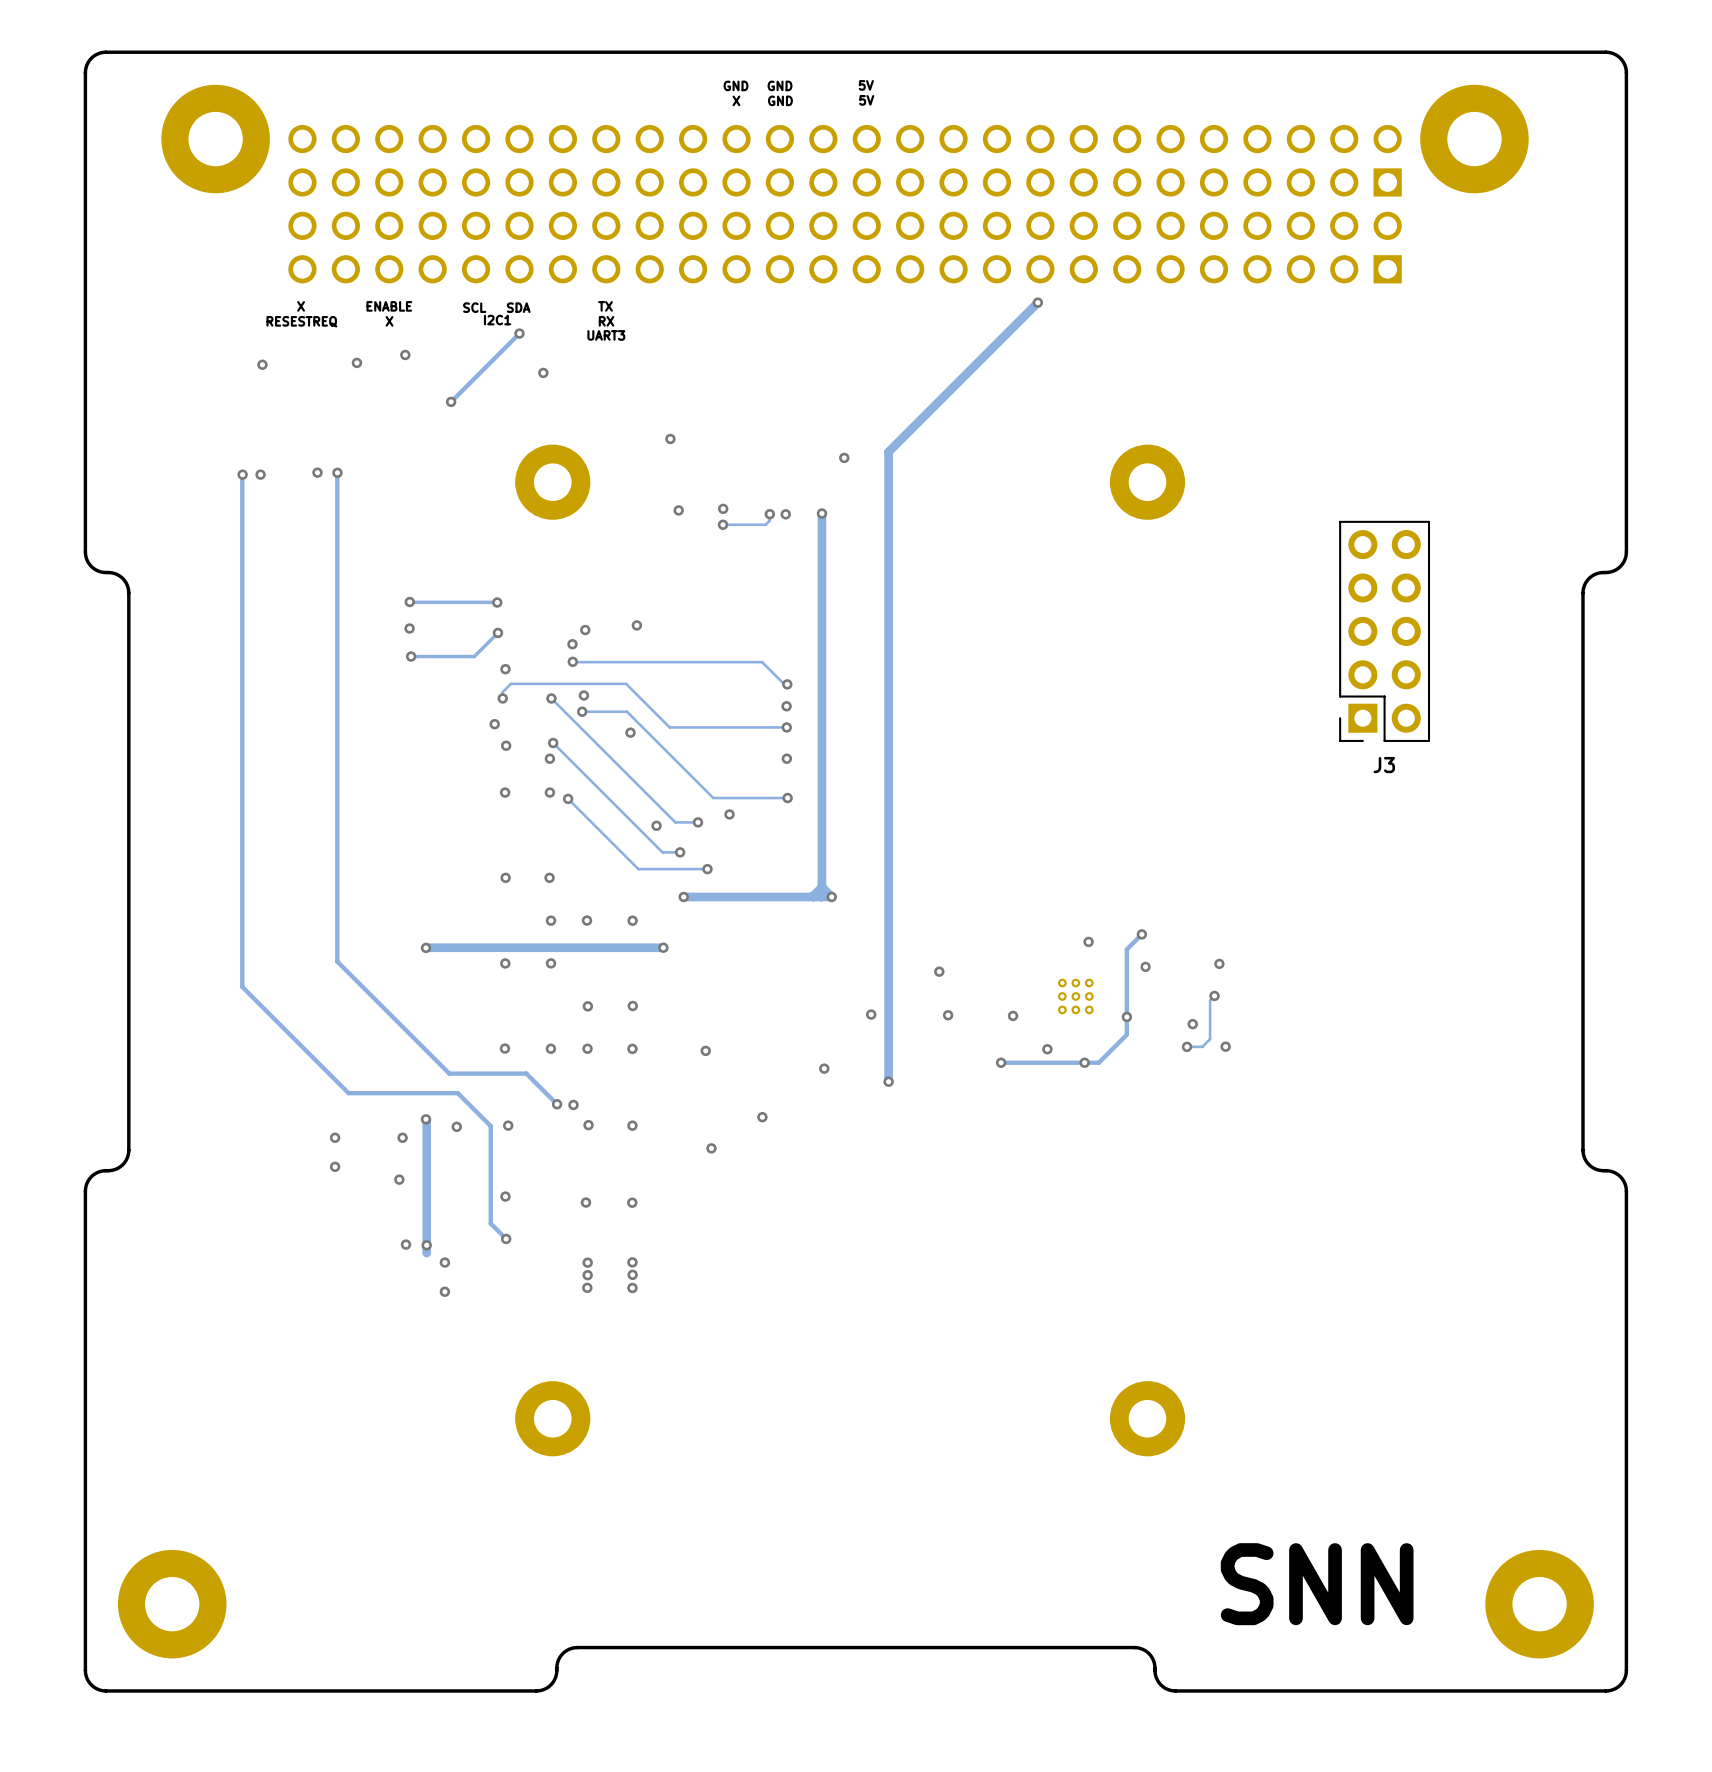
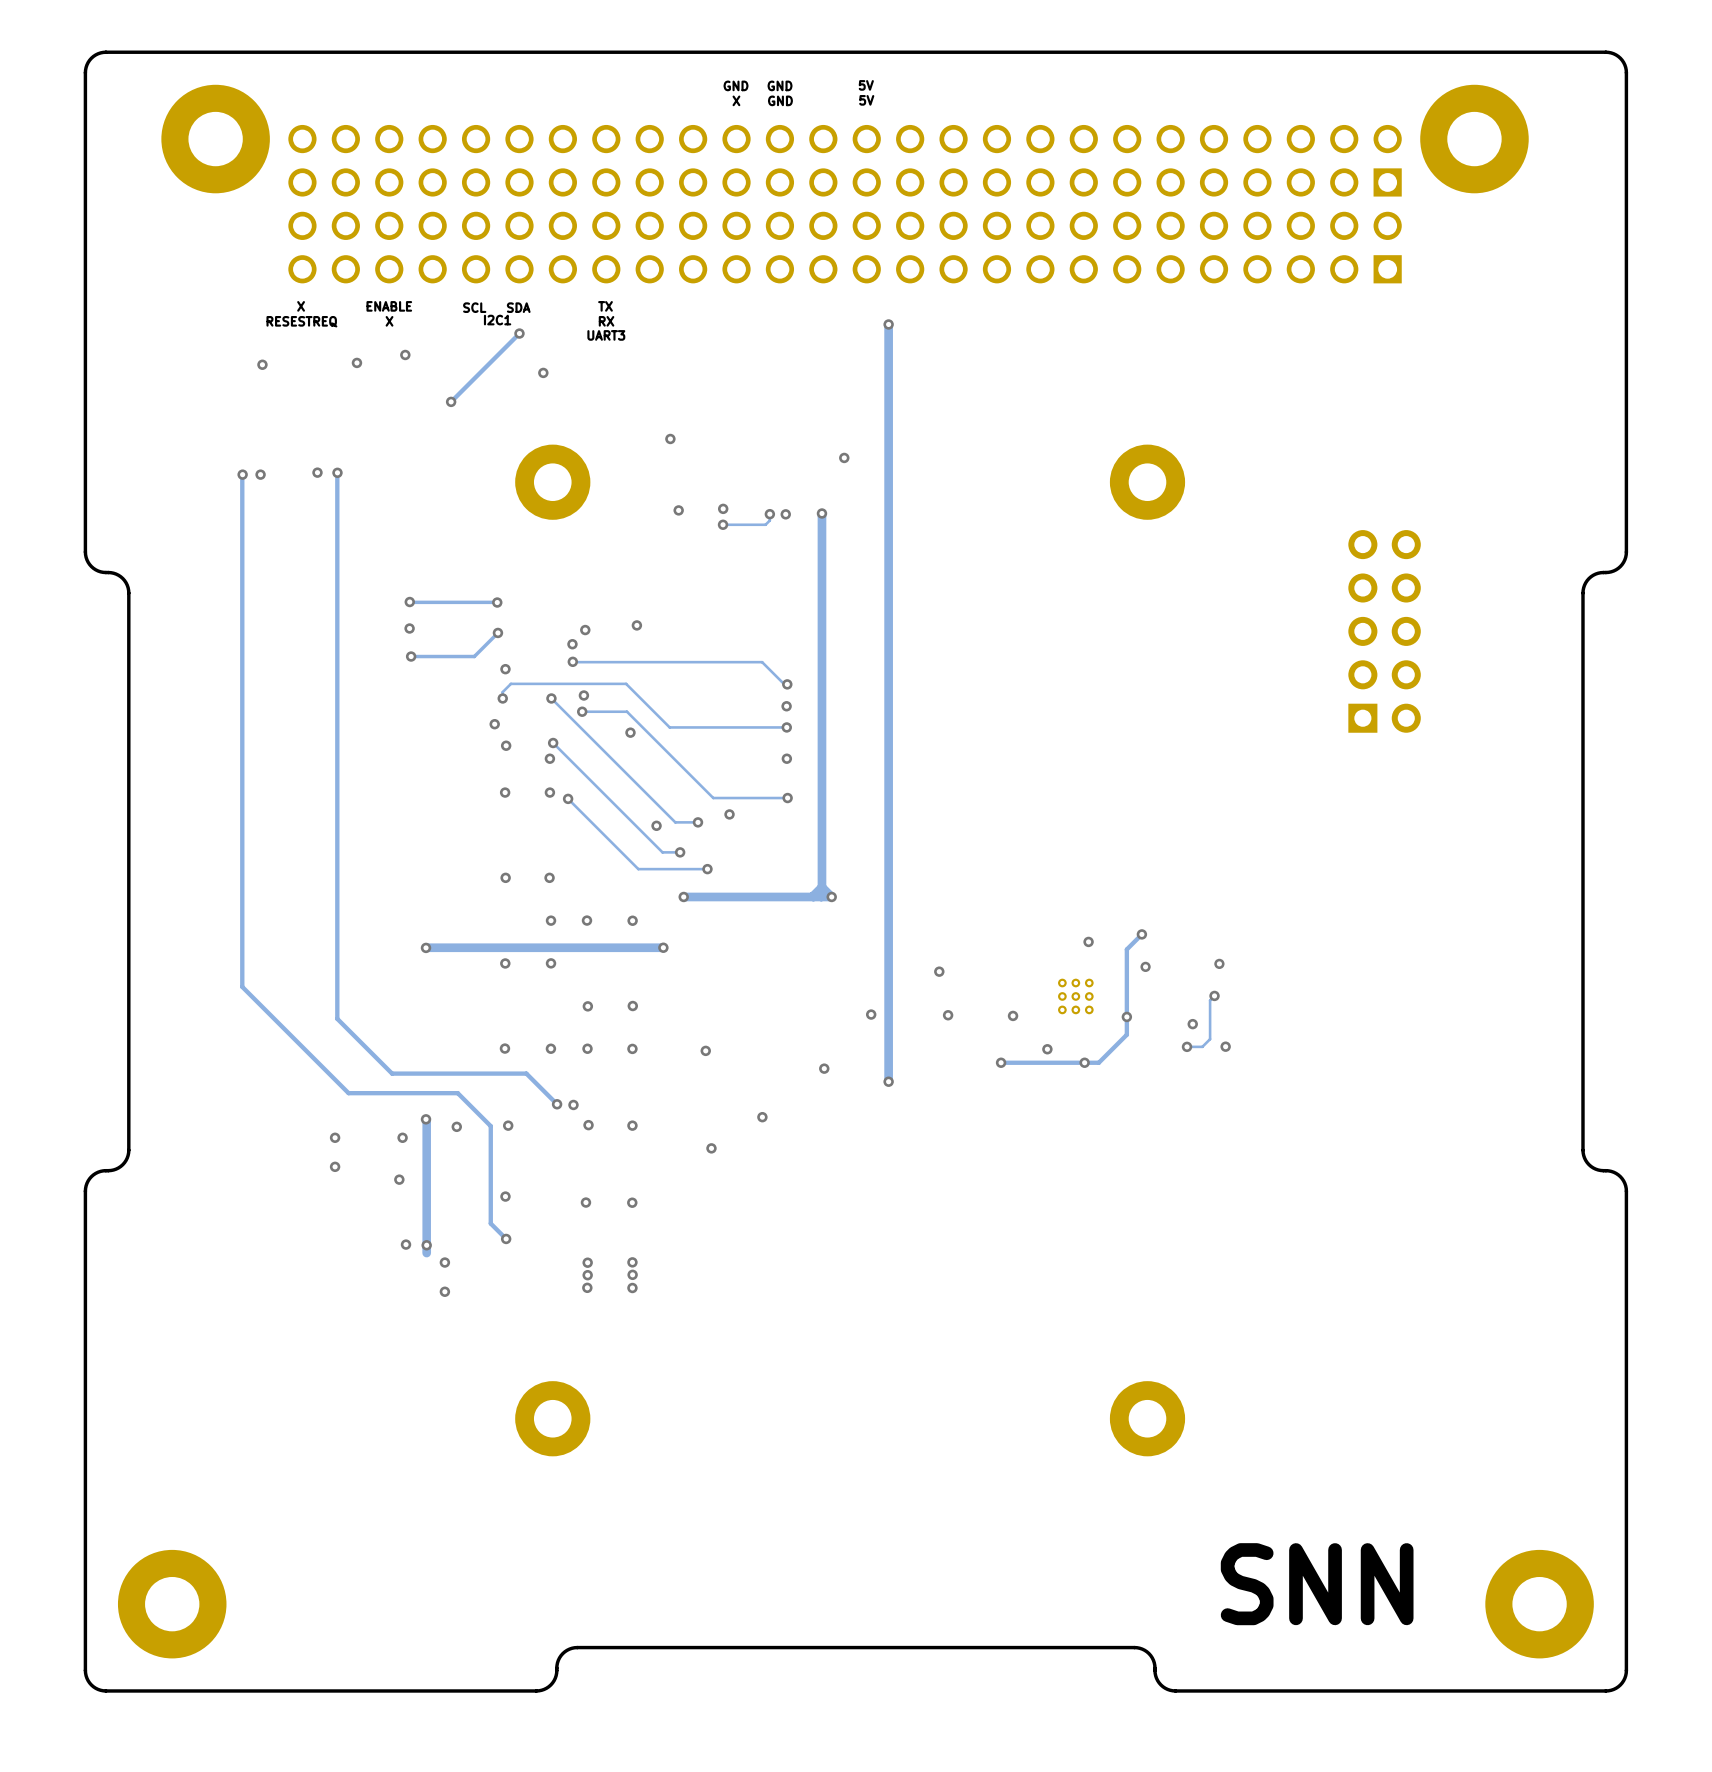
track: (1037, 302) (888, 451) -> (888, 324) (888, 451)
via: (1037, 302) -> none
via: none -> (888, 324)
J3: (1384, 631) -> none
track: (337, 961) (449, 1073) -> (337, 961) (337, 1018) (392, 1073) (449, 1073)

